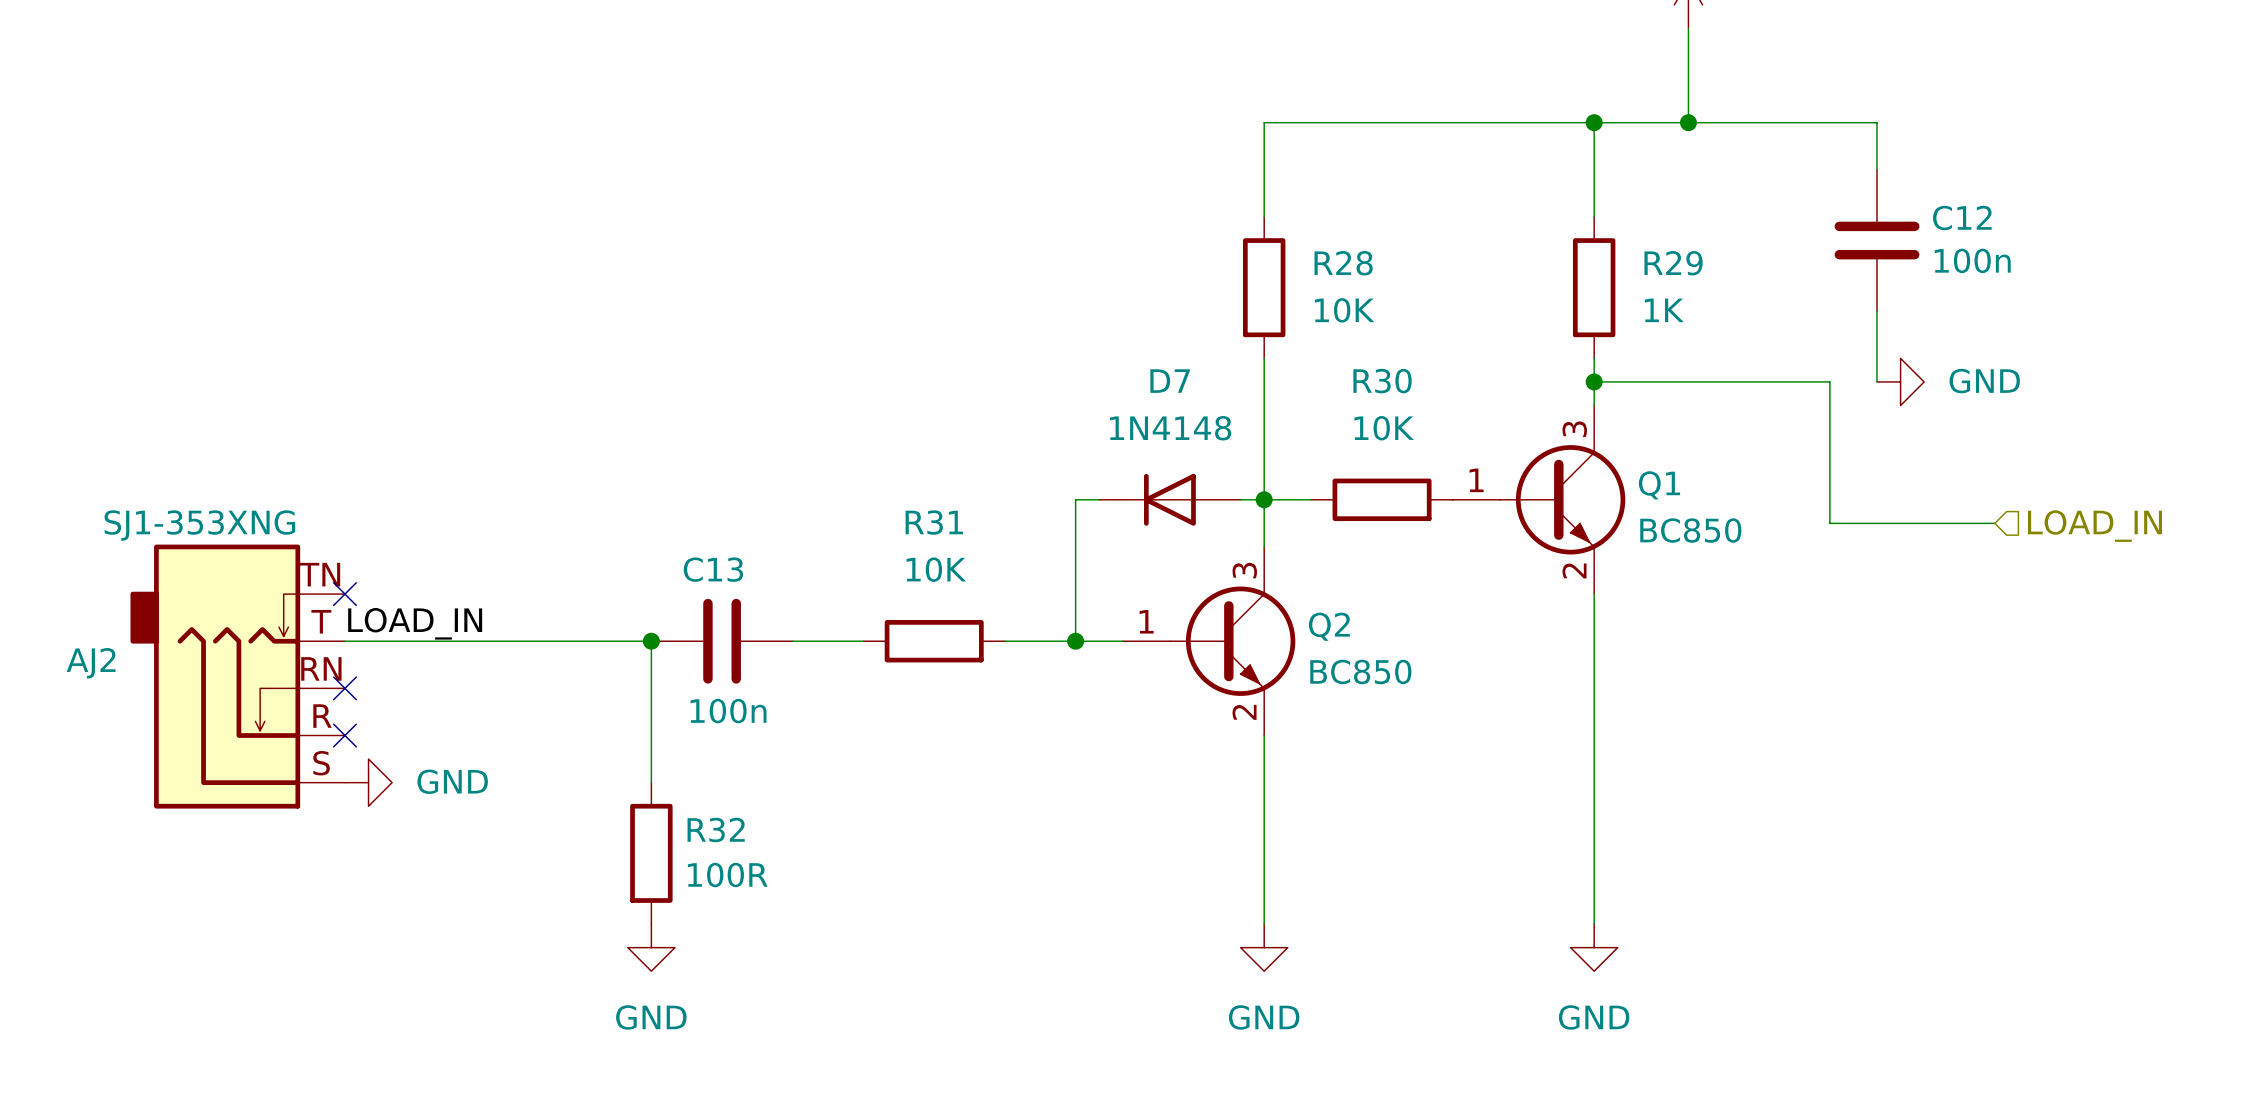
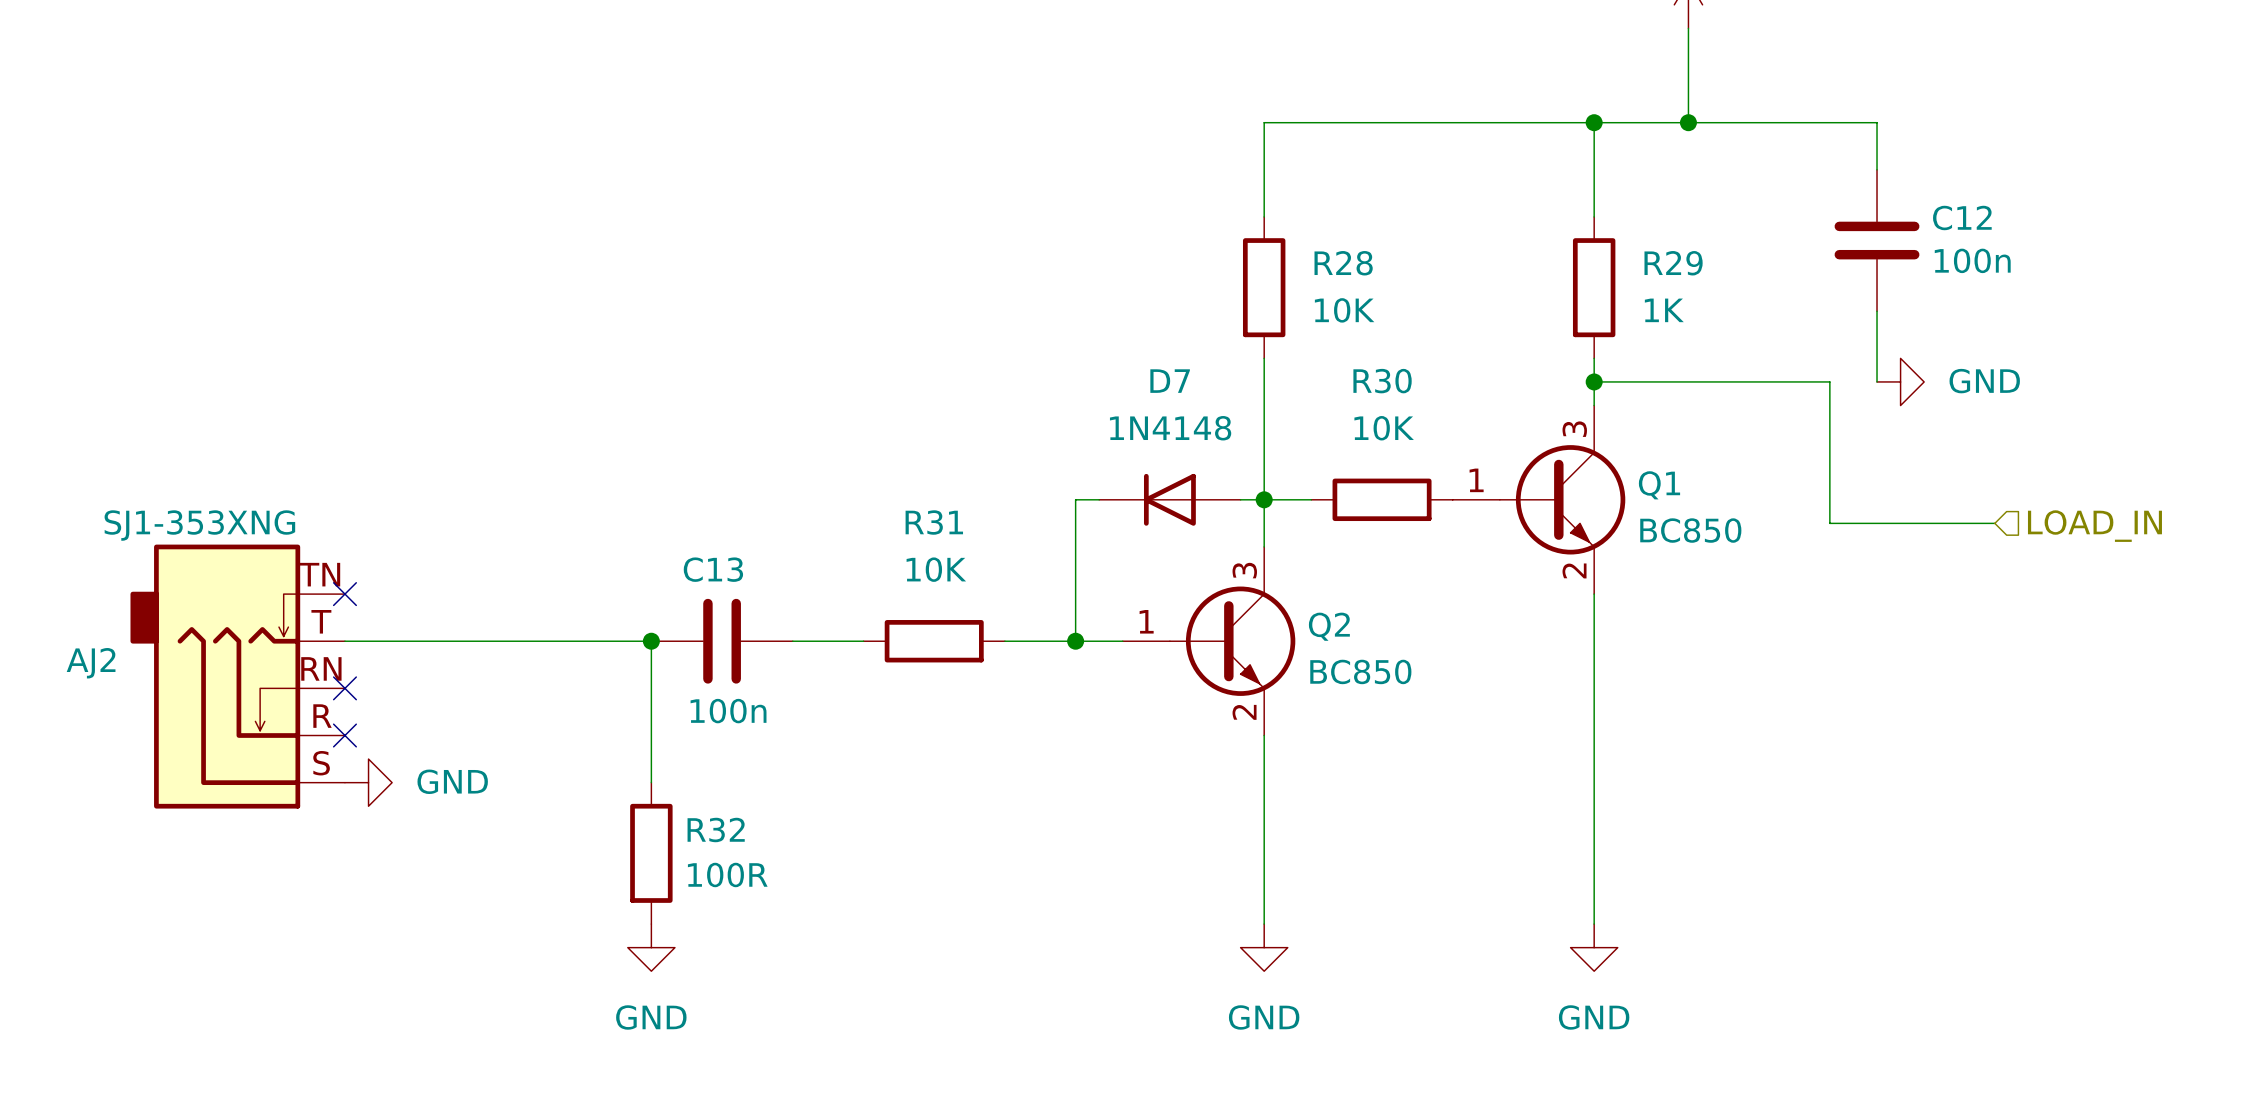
label: LOAD_IN (415, 623) -> none

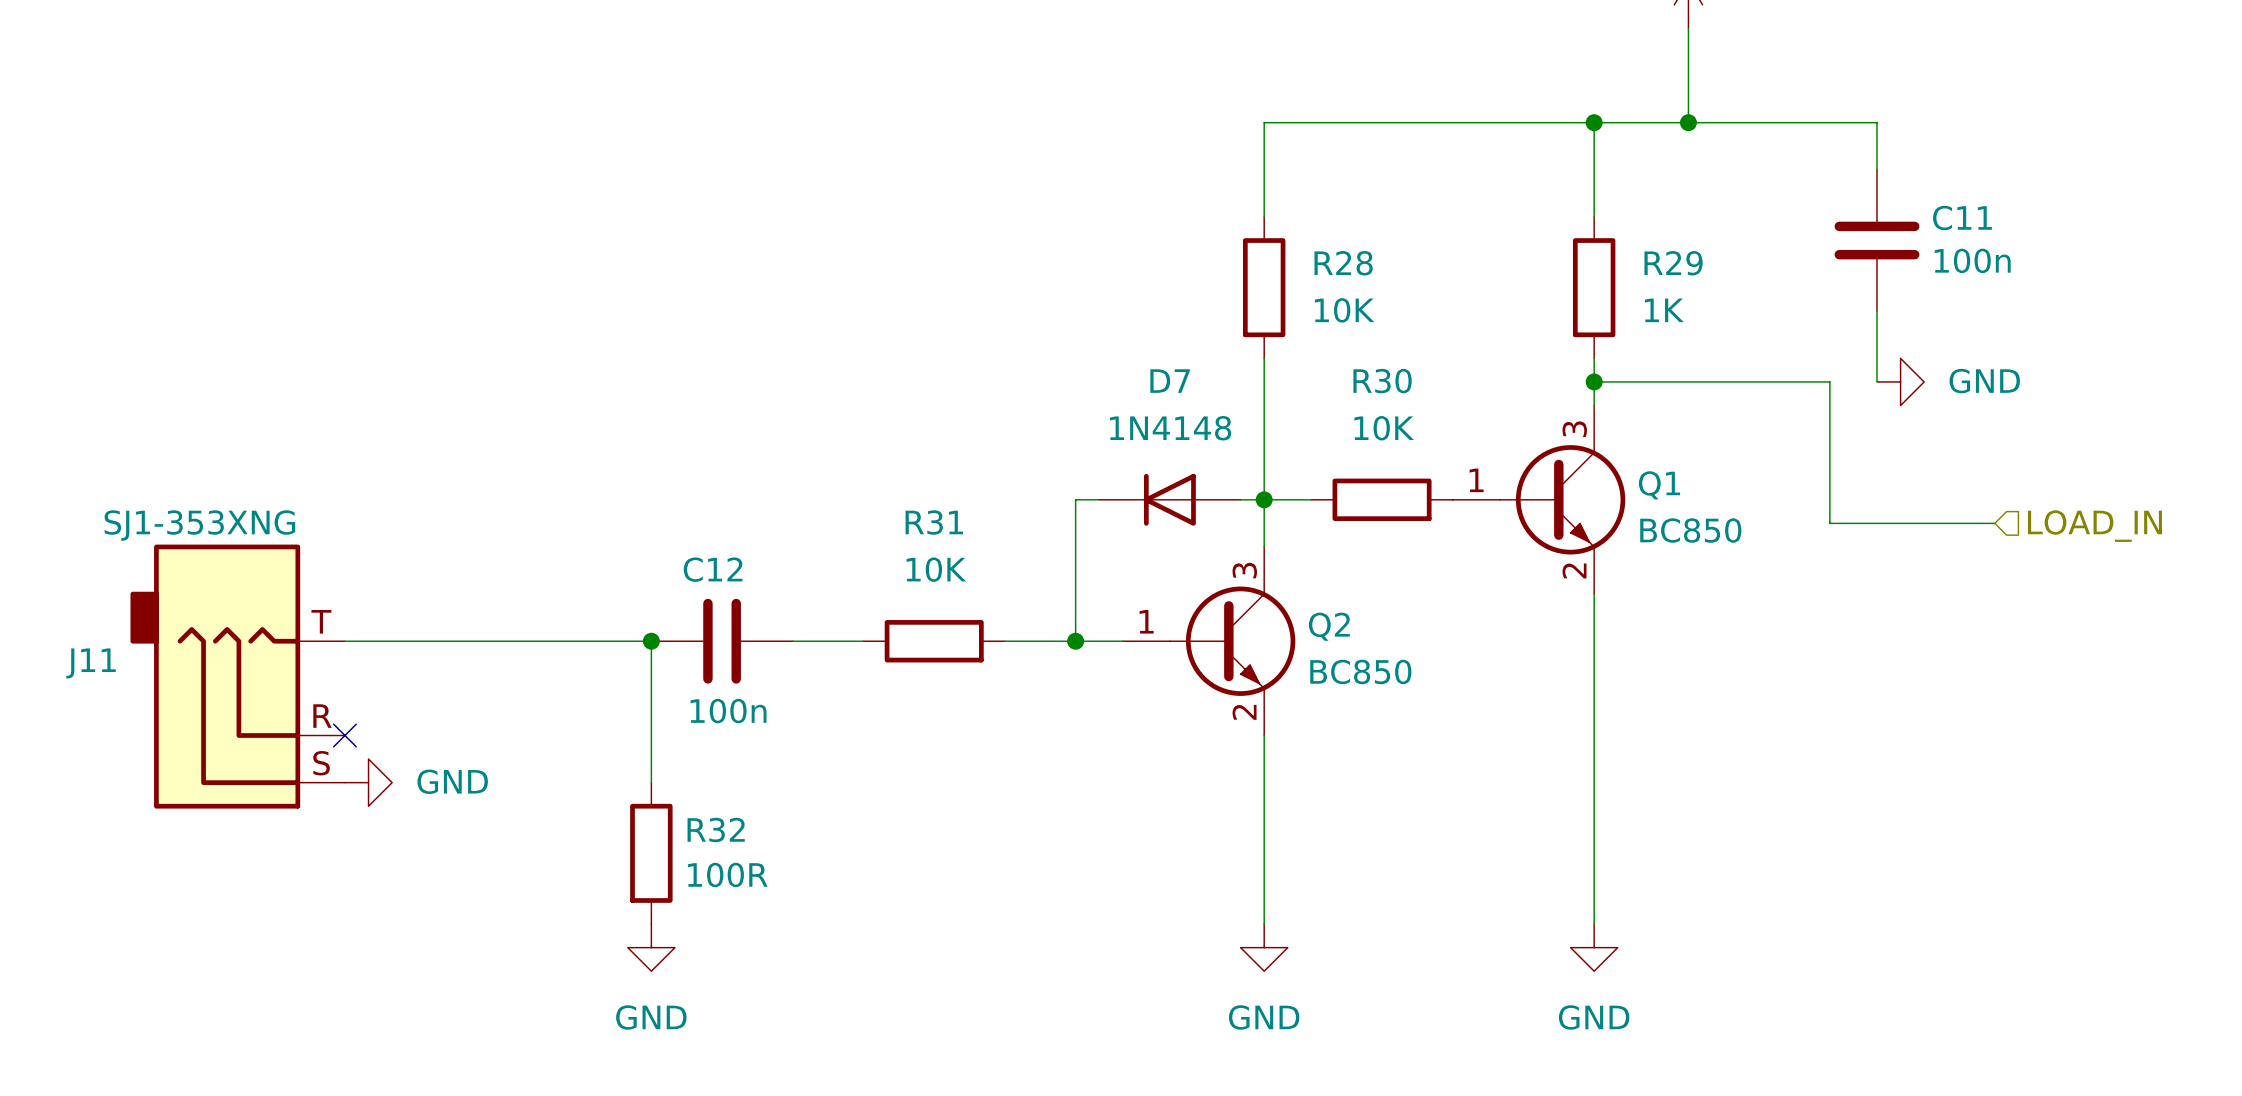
C12 name: C12 (1962, 217) -> C11 (1962, 217)
C13 name: C13 (713, 569) -> C12 (713, 569)
no-connect mark: (344, 594) -> none
AJ2: SJ1-353XNG (237, 676) -> none
J11: none -> SJ1-353XNG (237, 676)
no-connect mark: (344, 688) -> none

